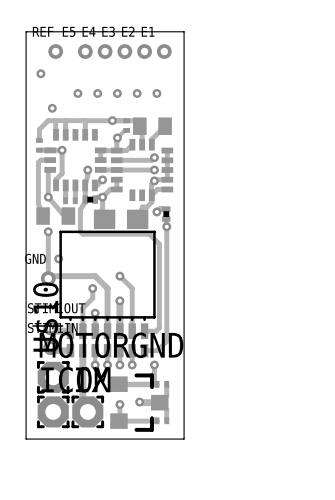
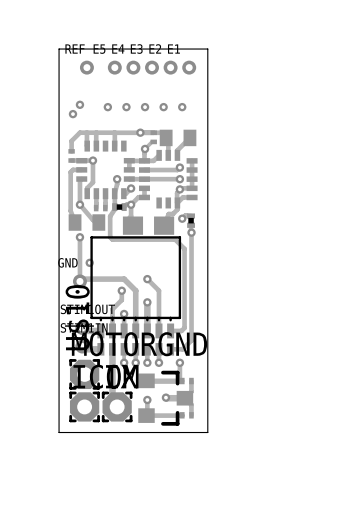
via: (40, 73) -> none
via: none -> (79, 104)
via: none -> (72, 114)
via: (52, 108) -> none

